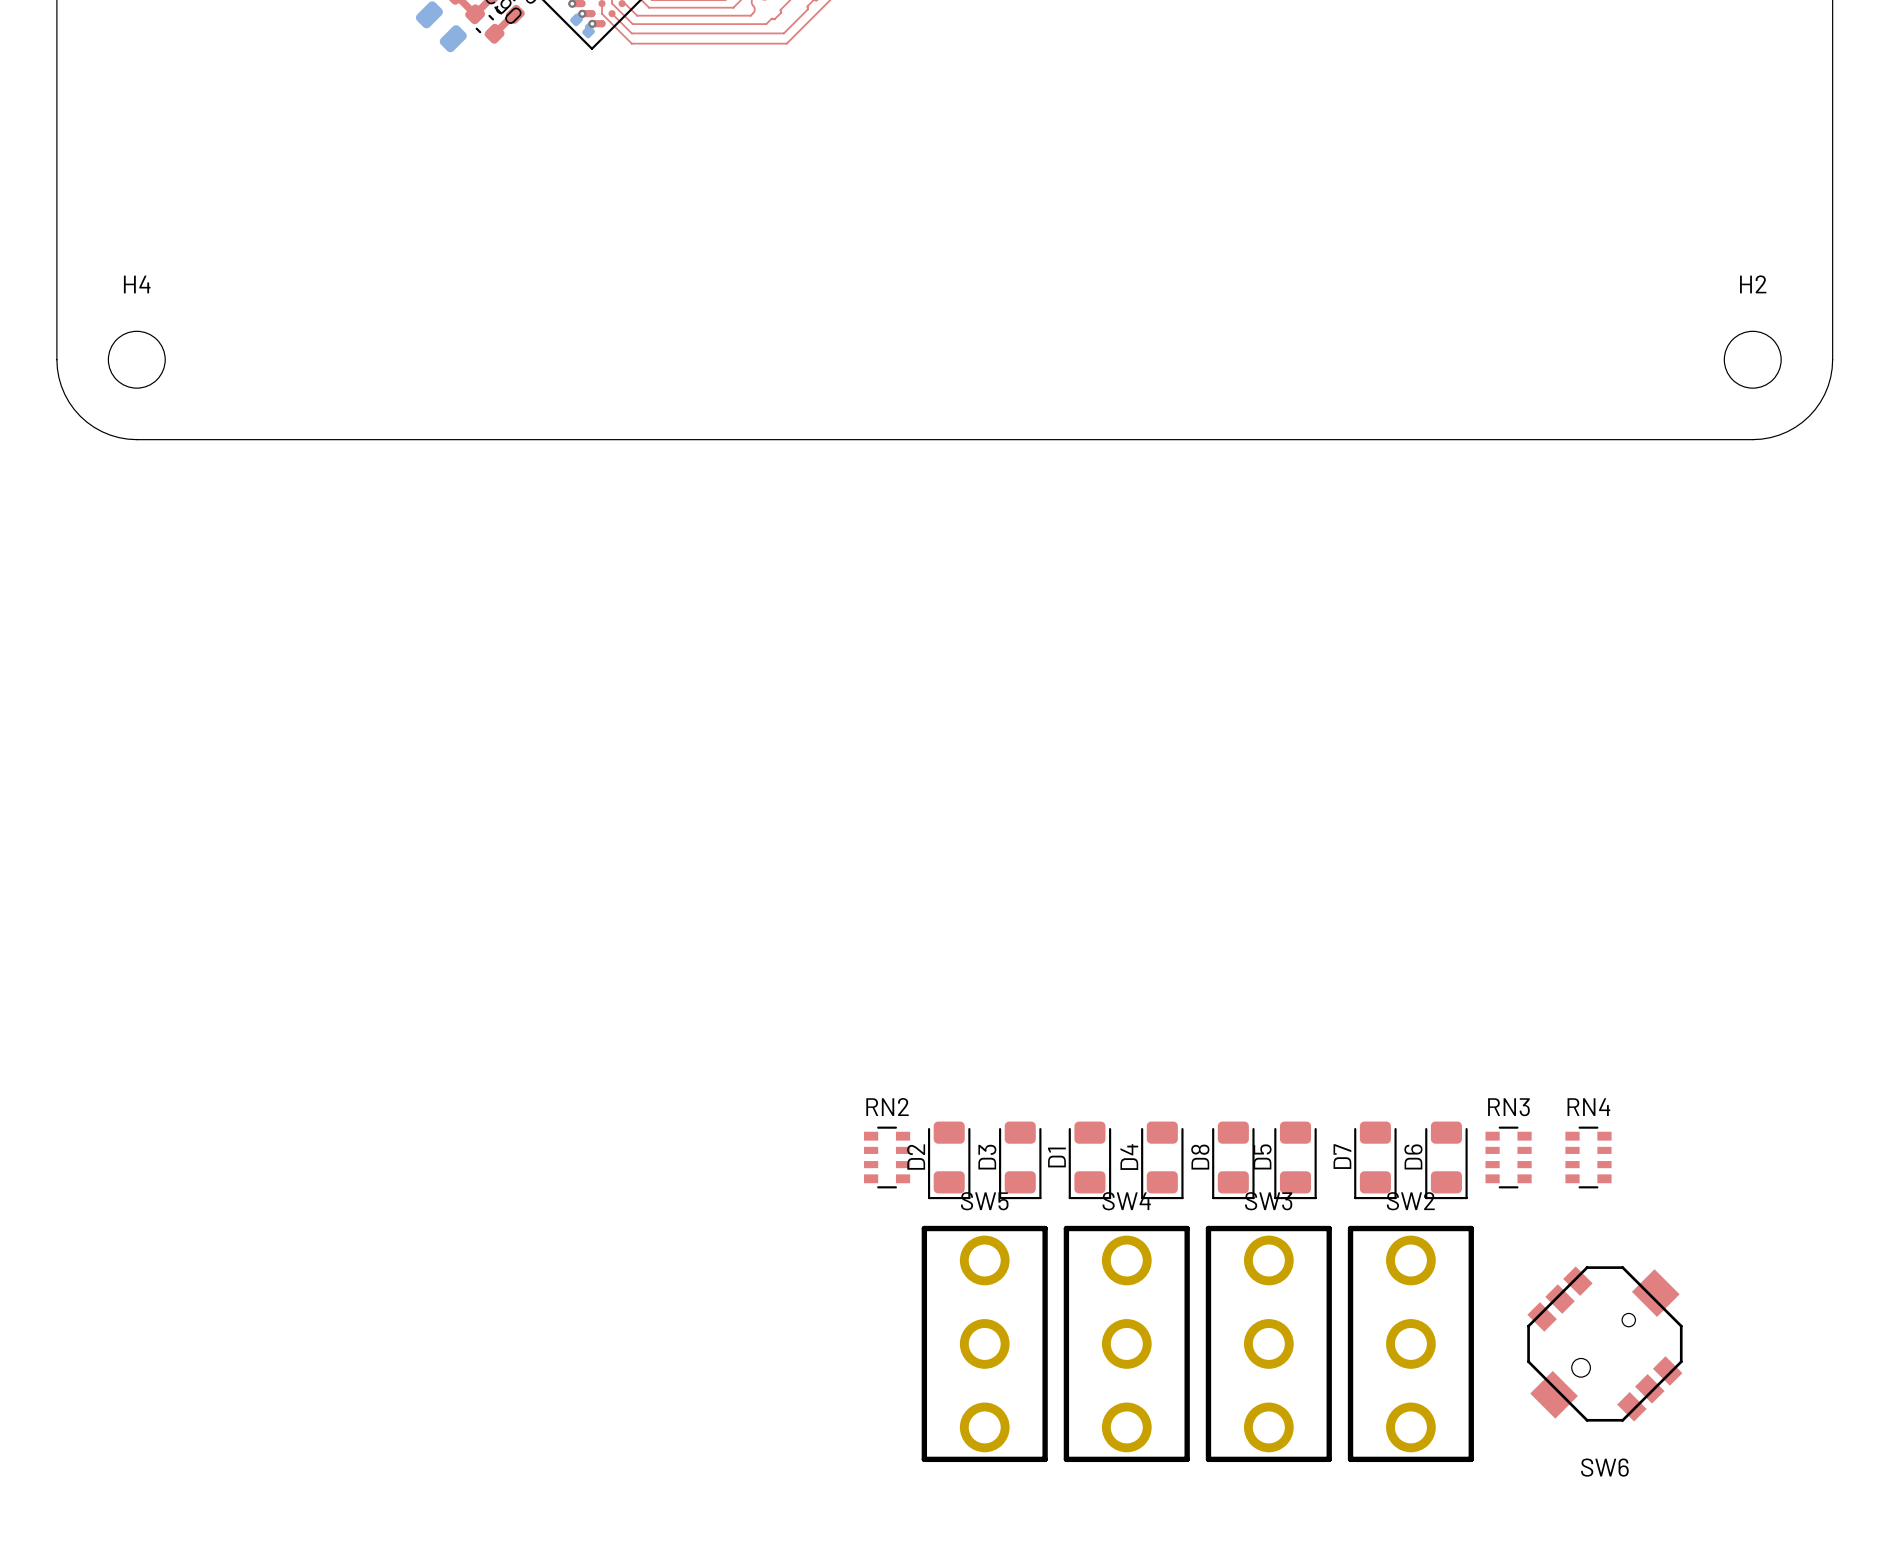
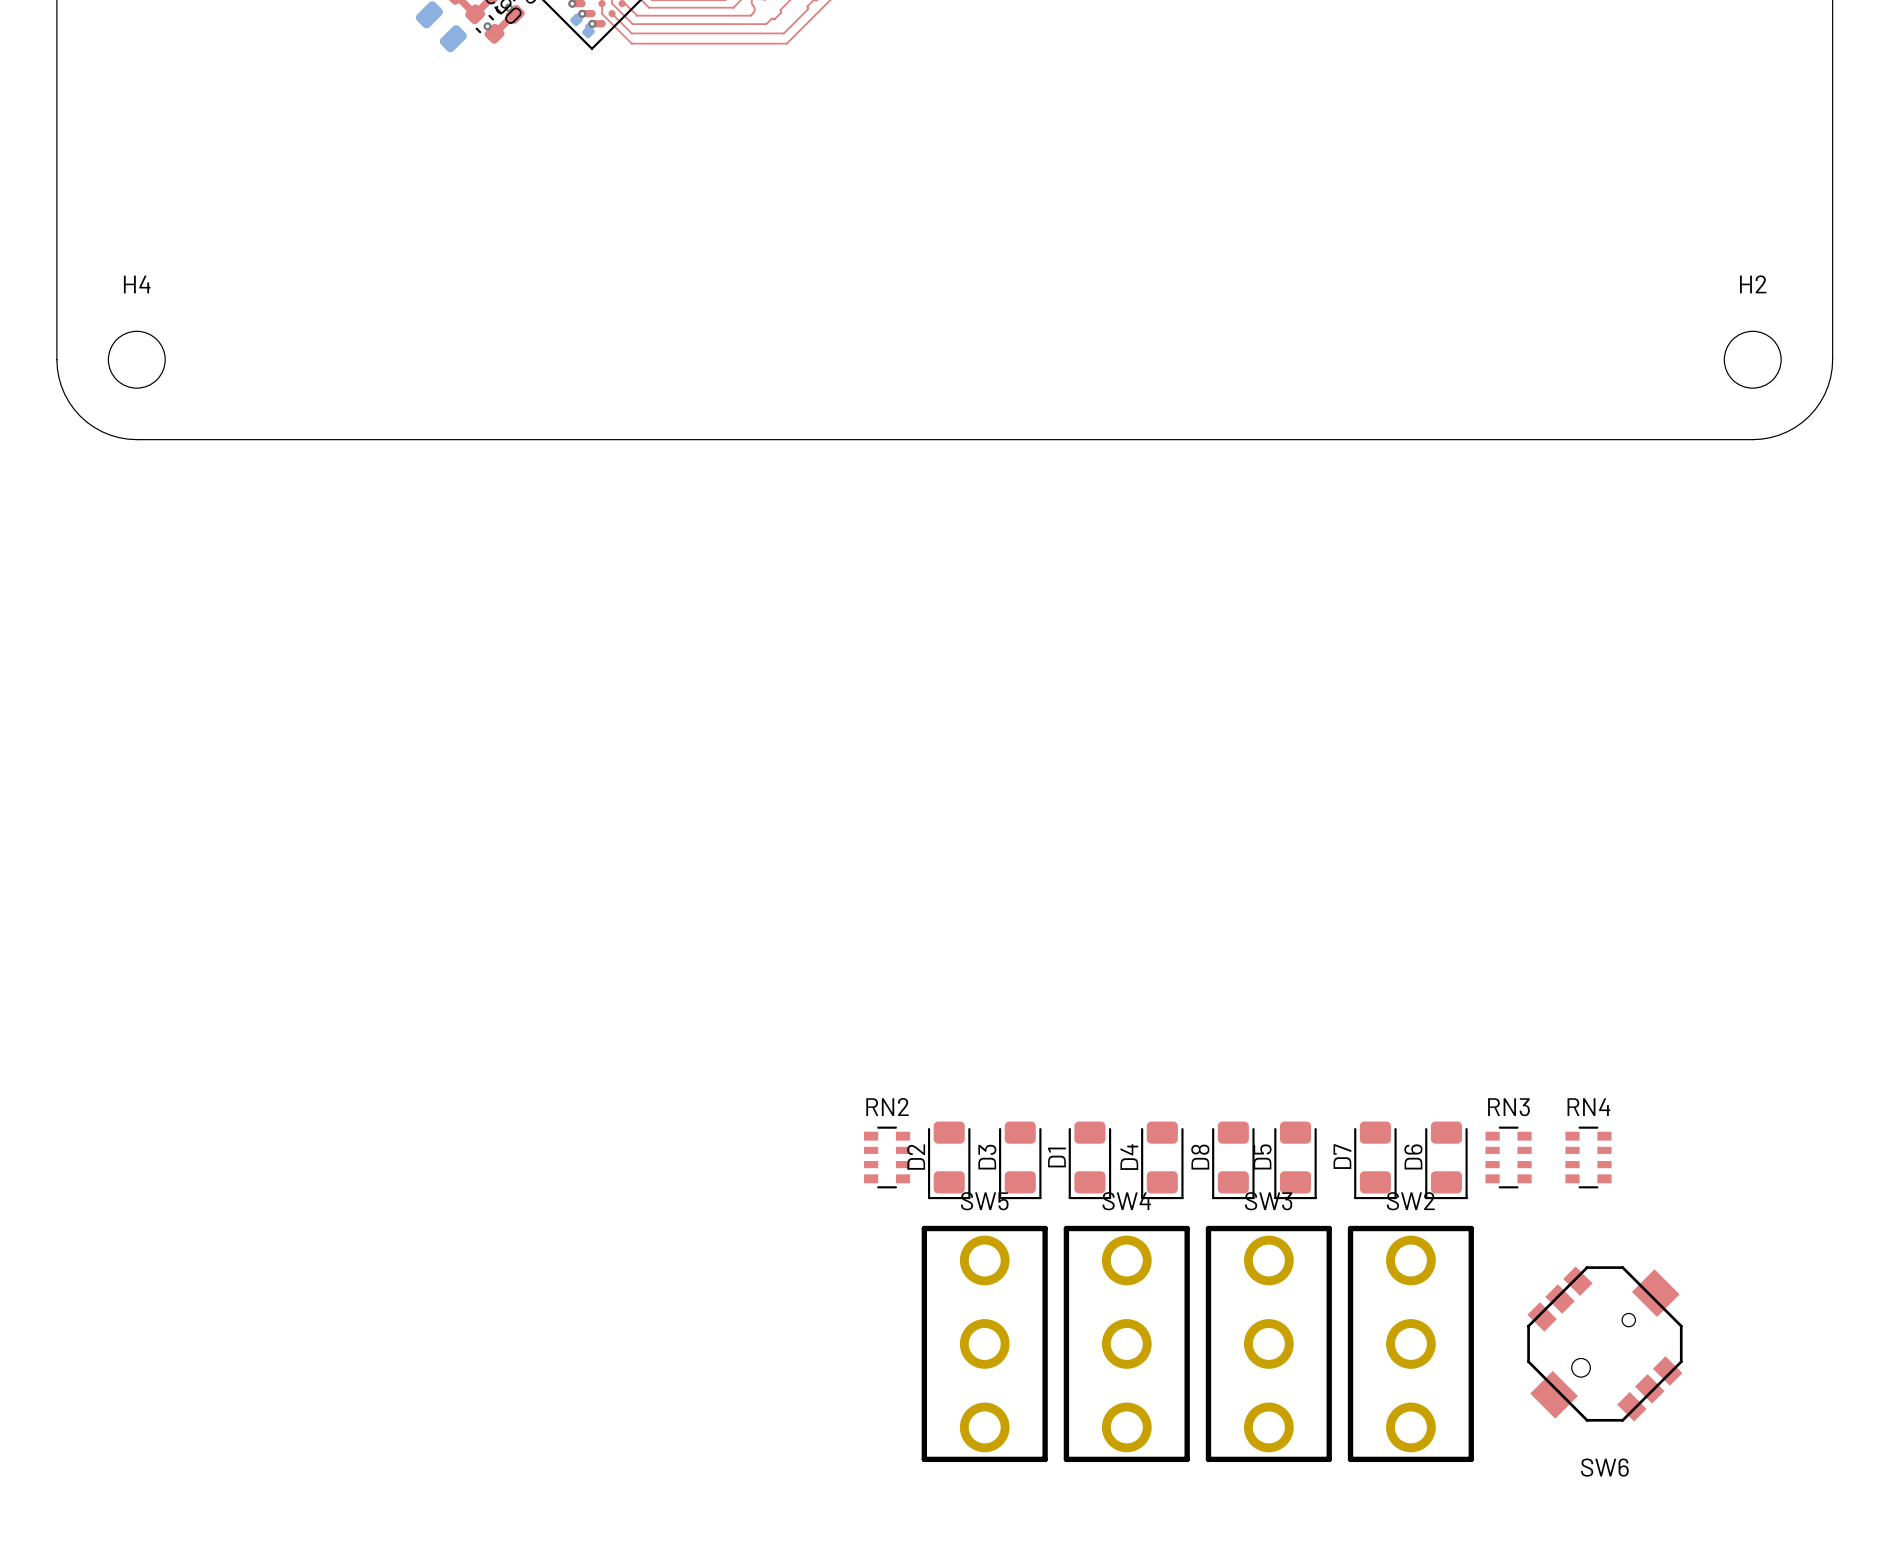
via: none -> (508, 7)
via: none -> (487, 26)

